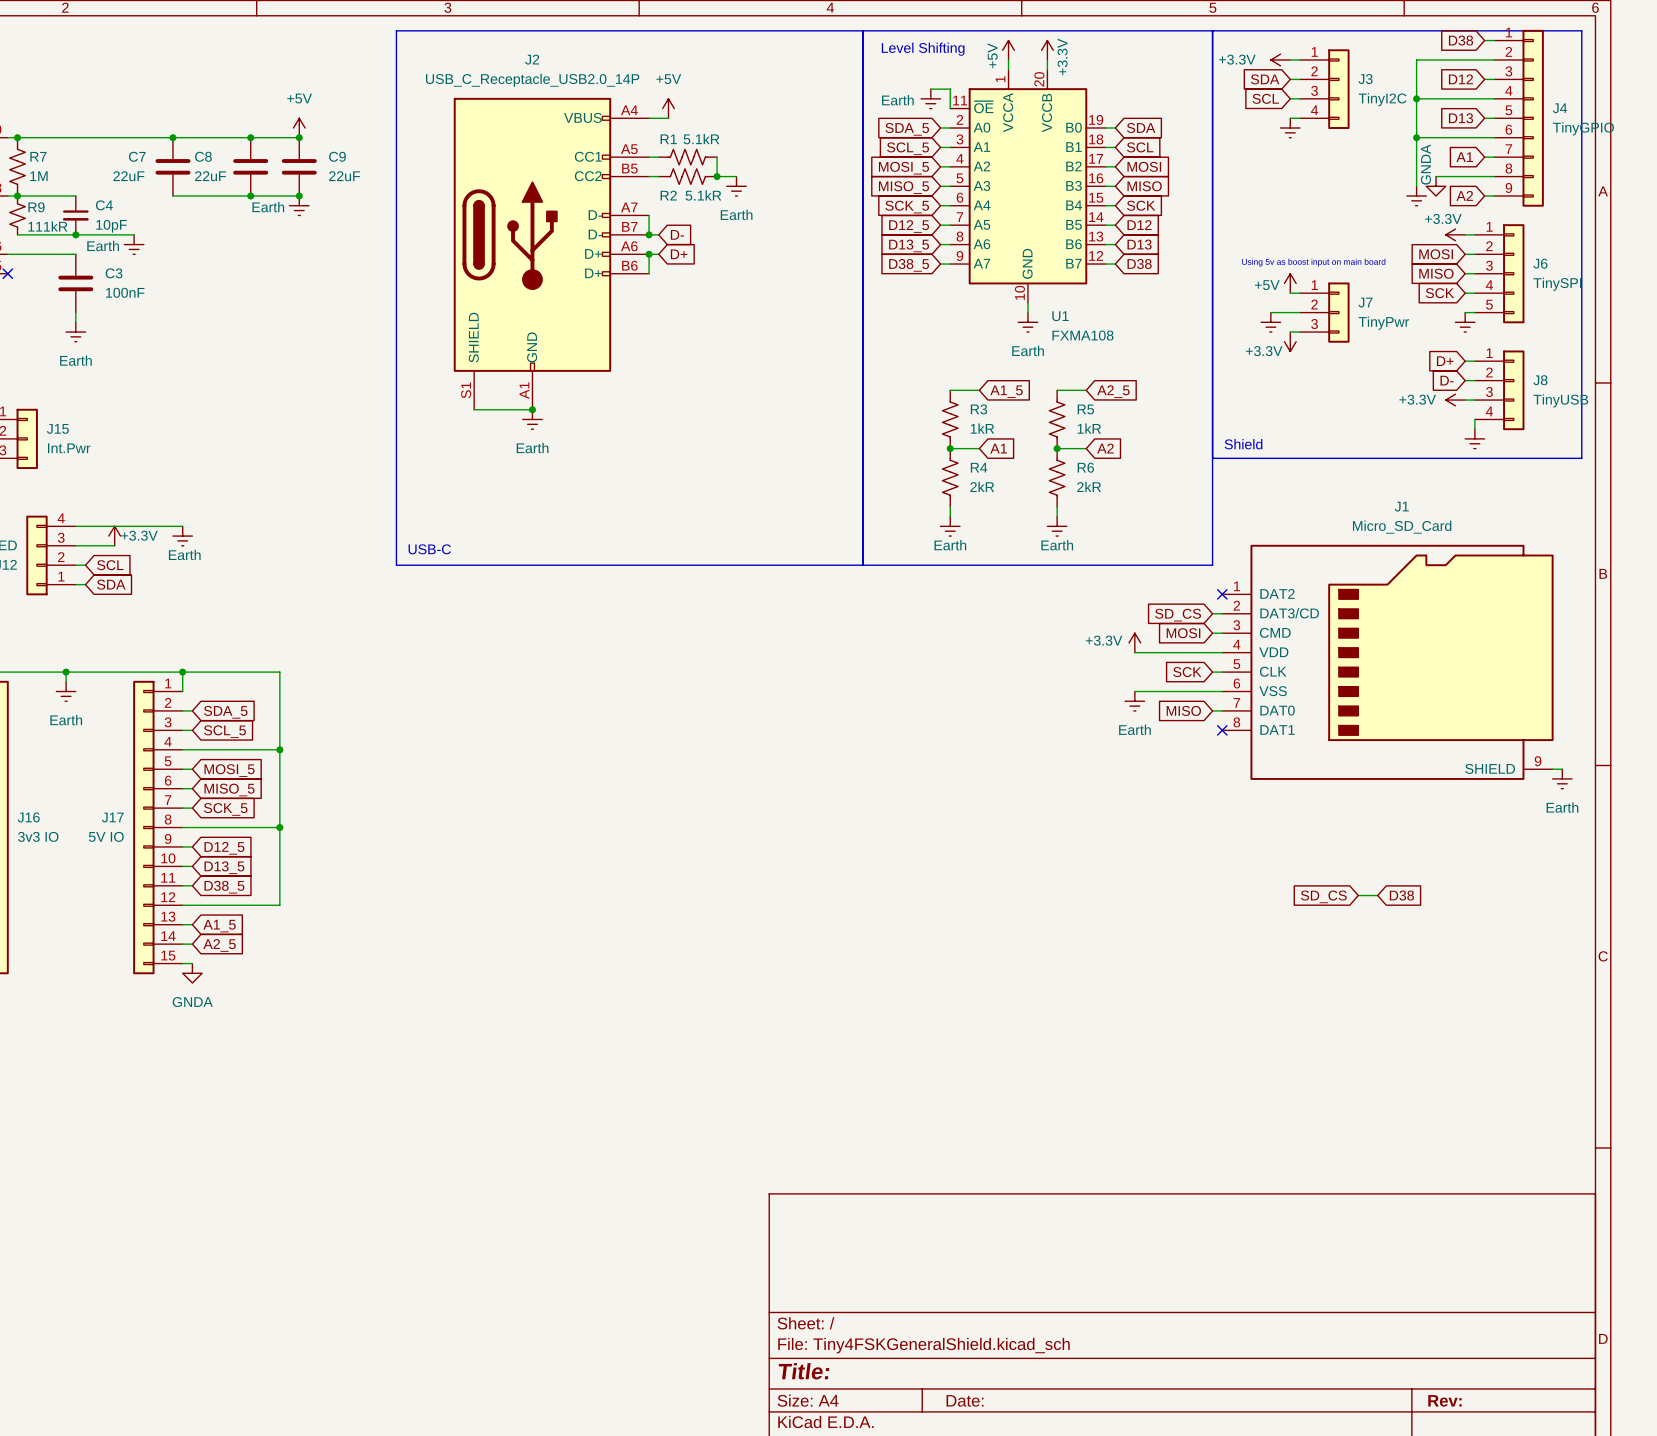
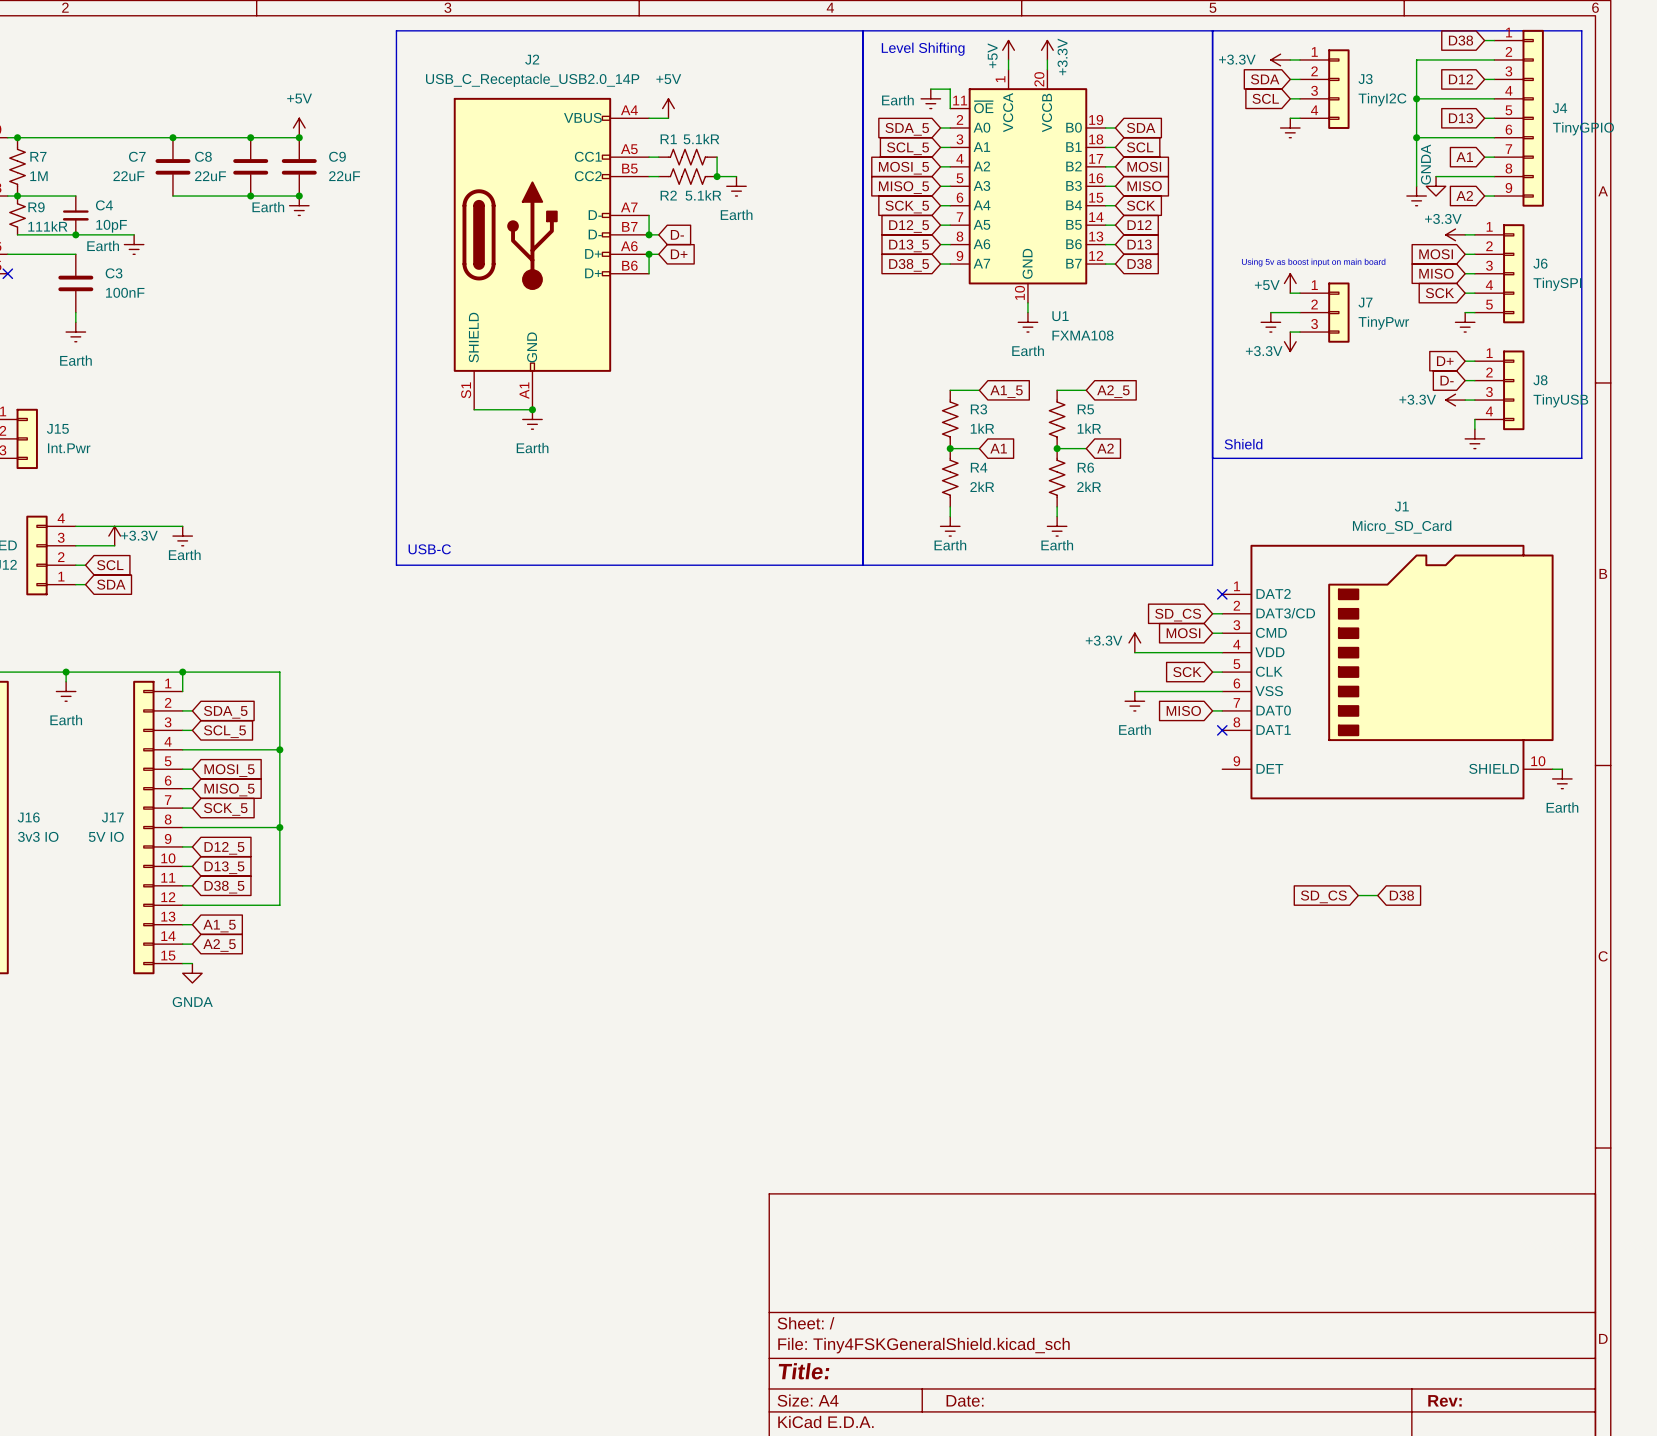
J1 symbol: [1222, 544, 1554, 780] -> [1222, 544, 1554, 800]

